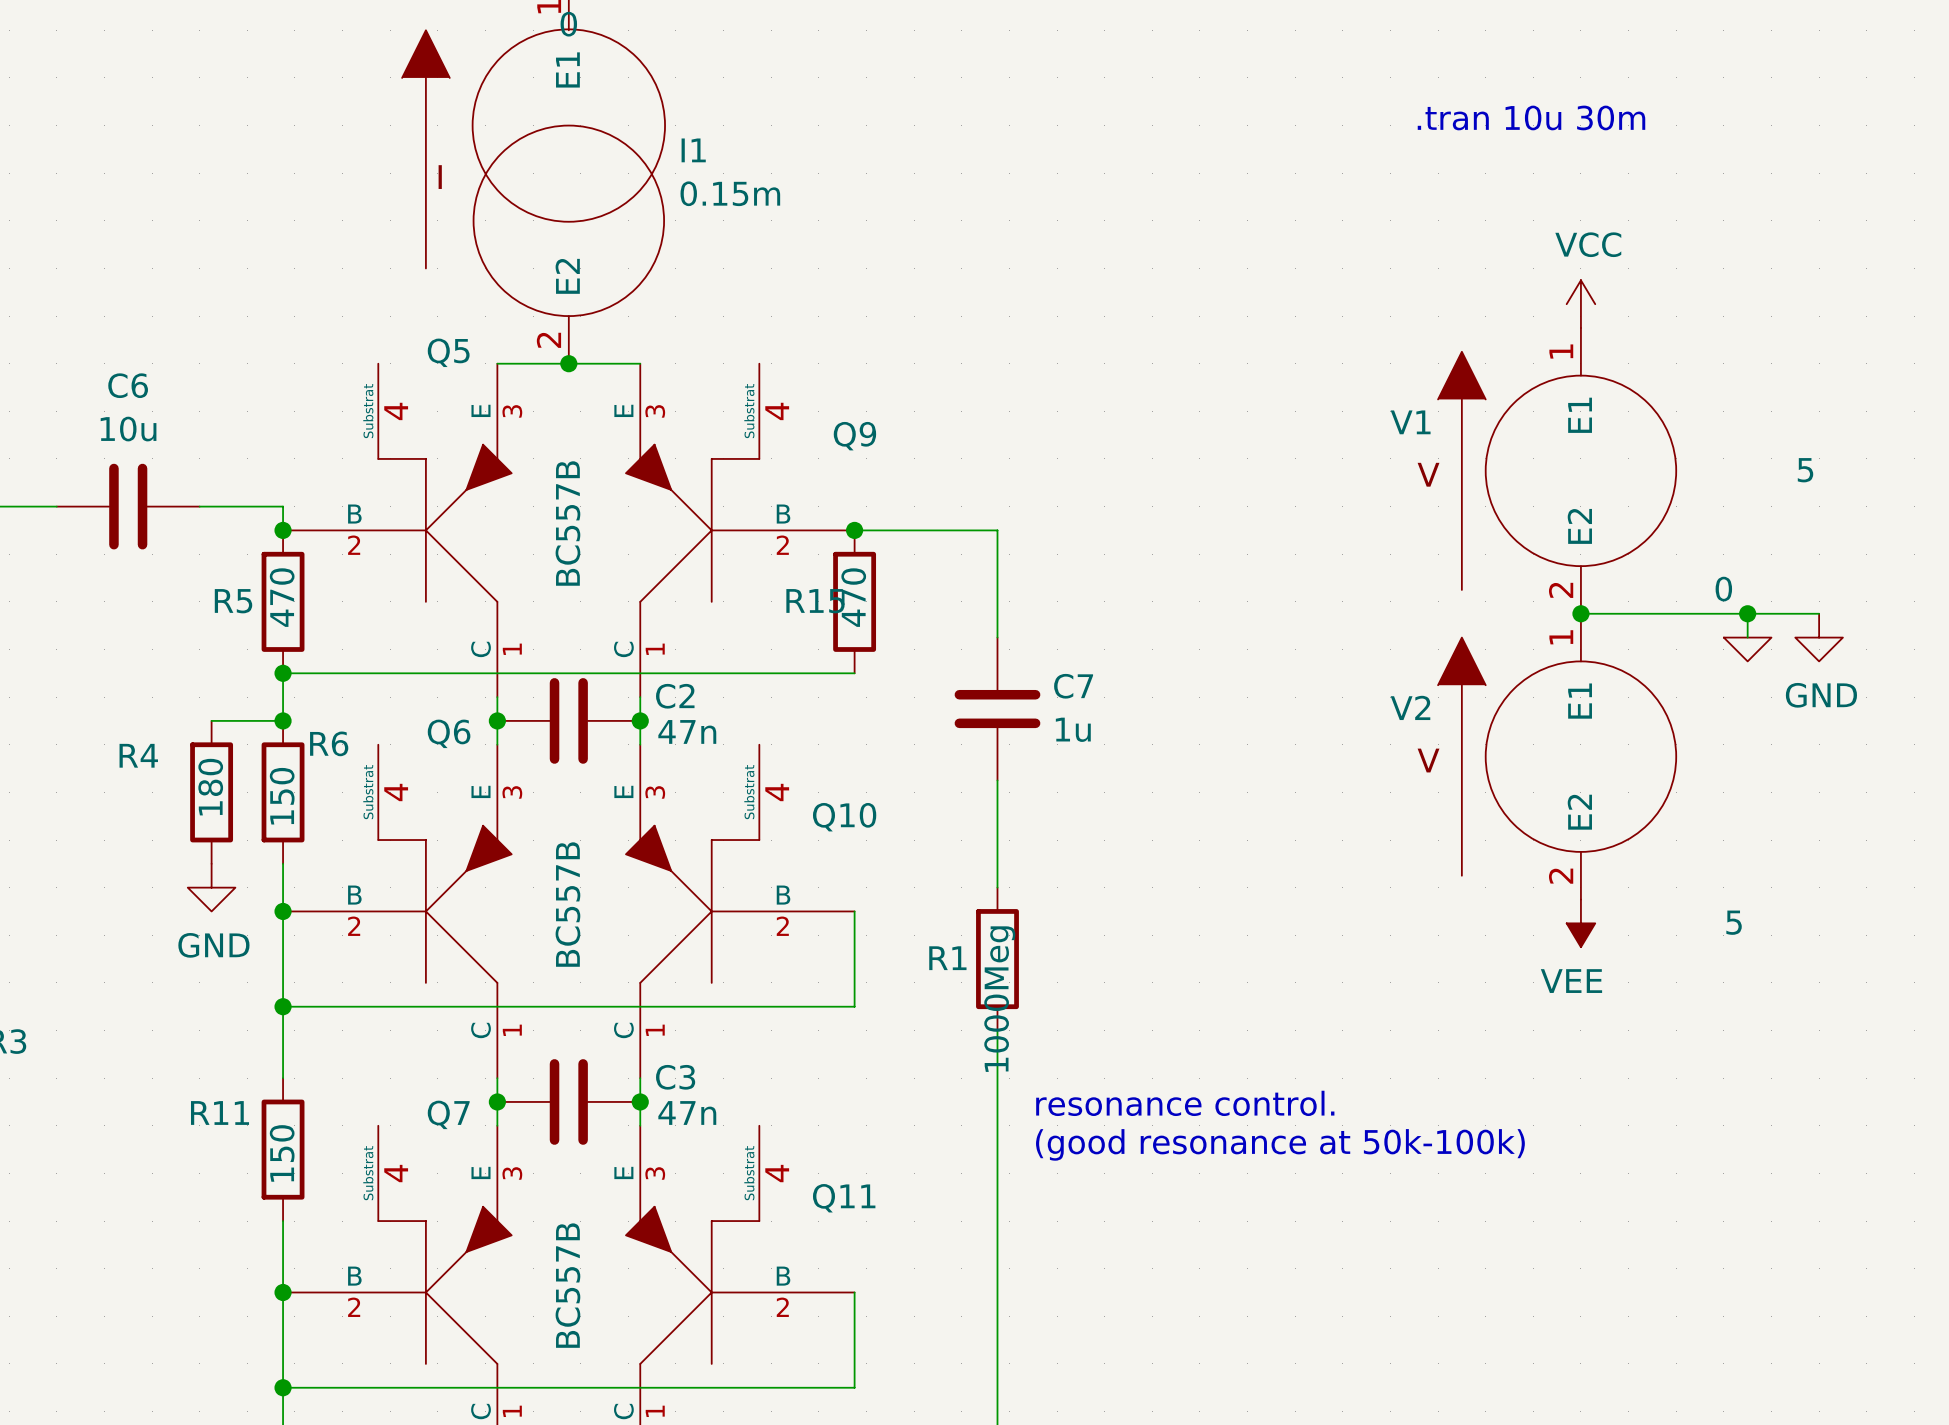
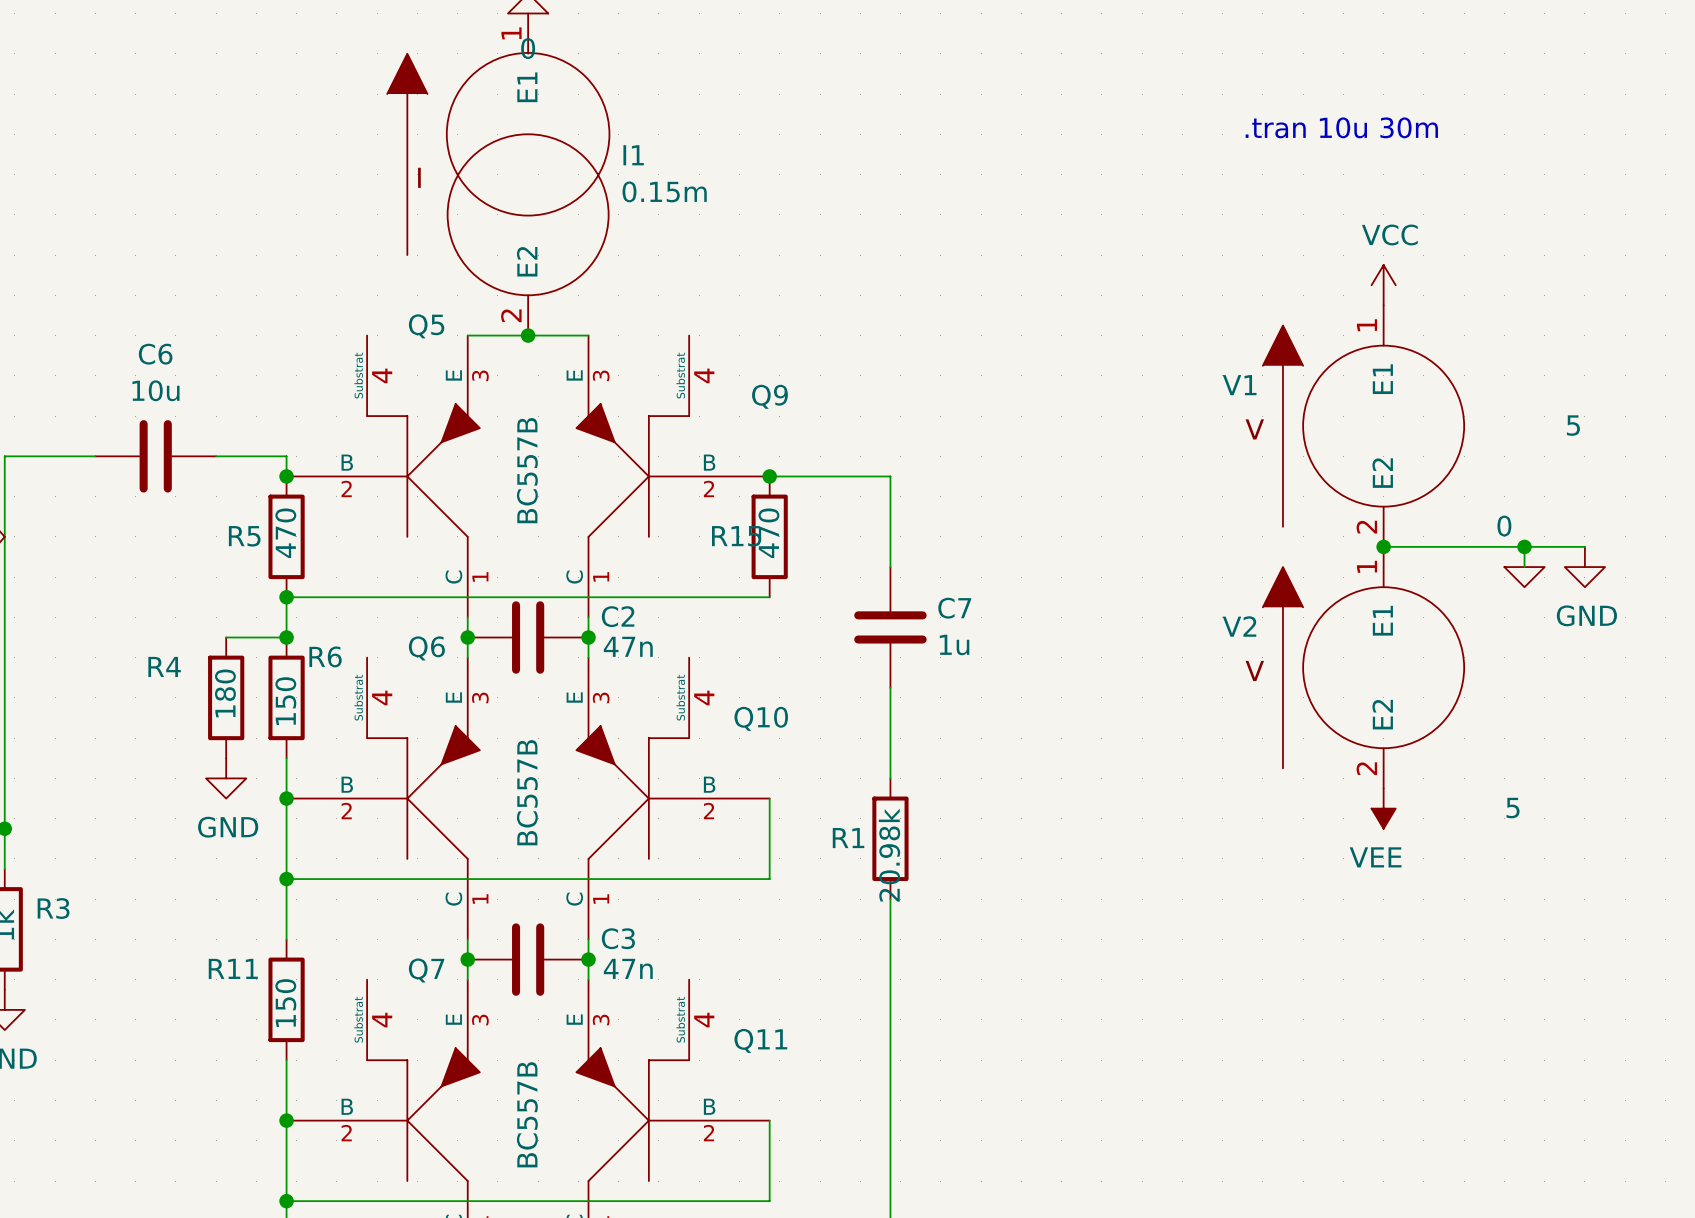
R1 value: 1000Meg (999, 999) -> 20.98k (889, 855)
text: resonance control. (1185, 1103) -> none
text: (good resonance at 50k-100k) (1280, 1144) -> none

